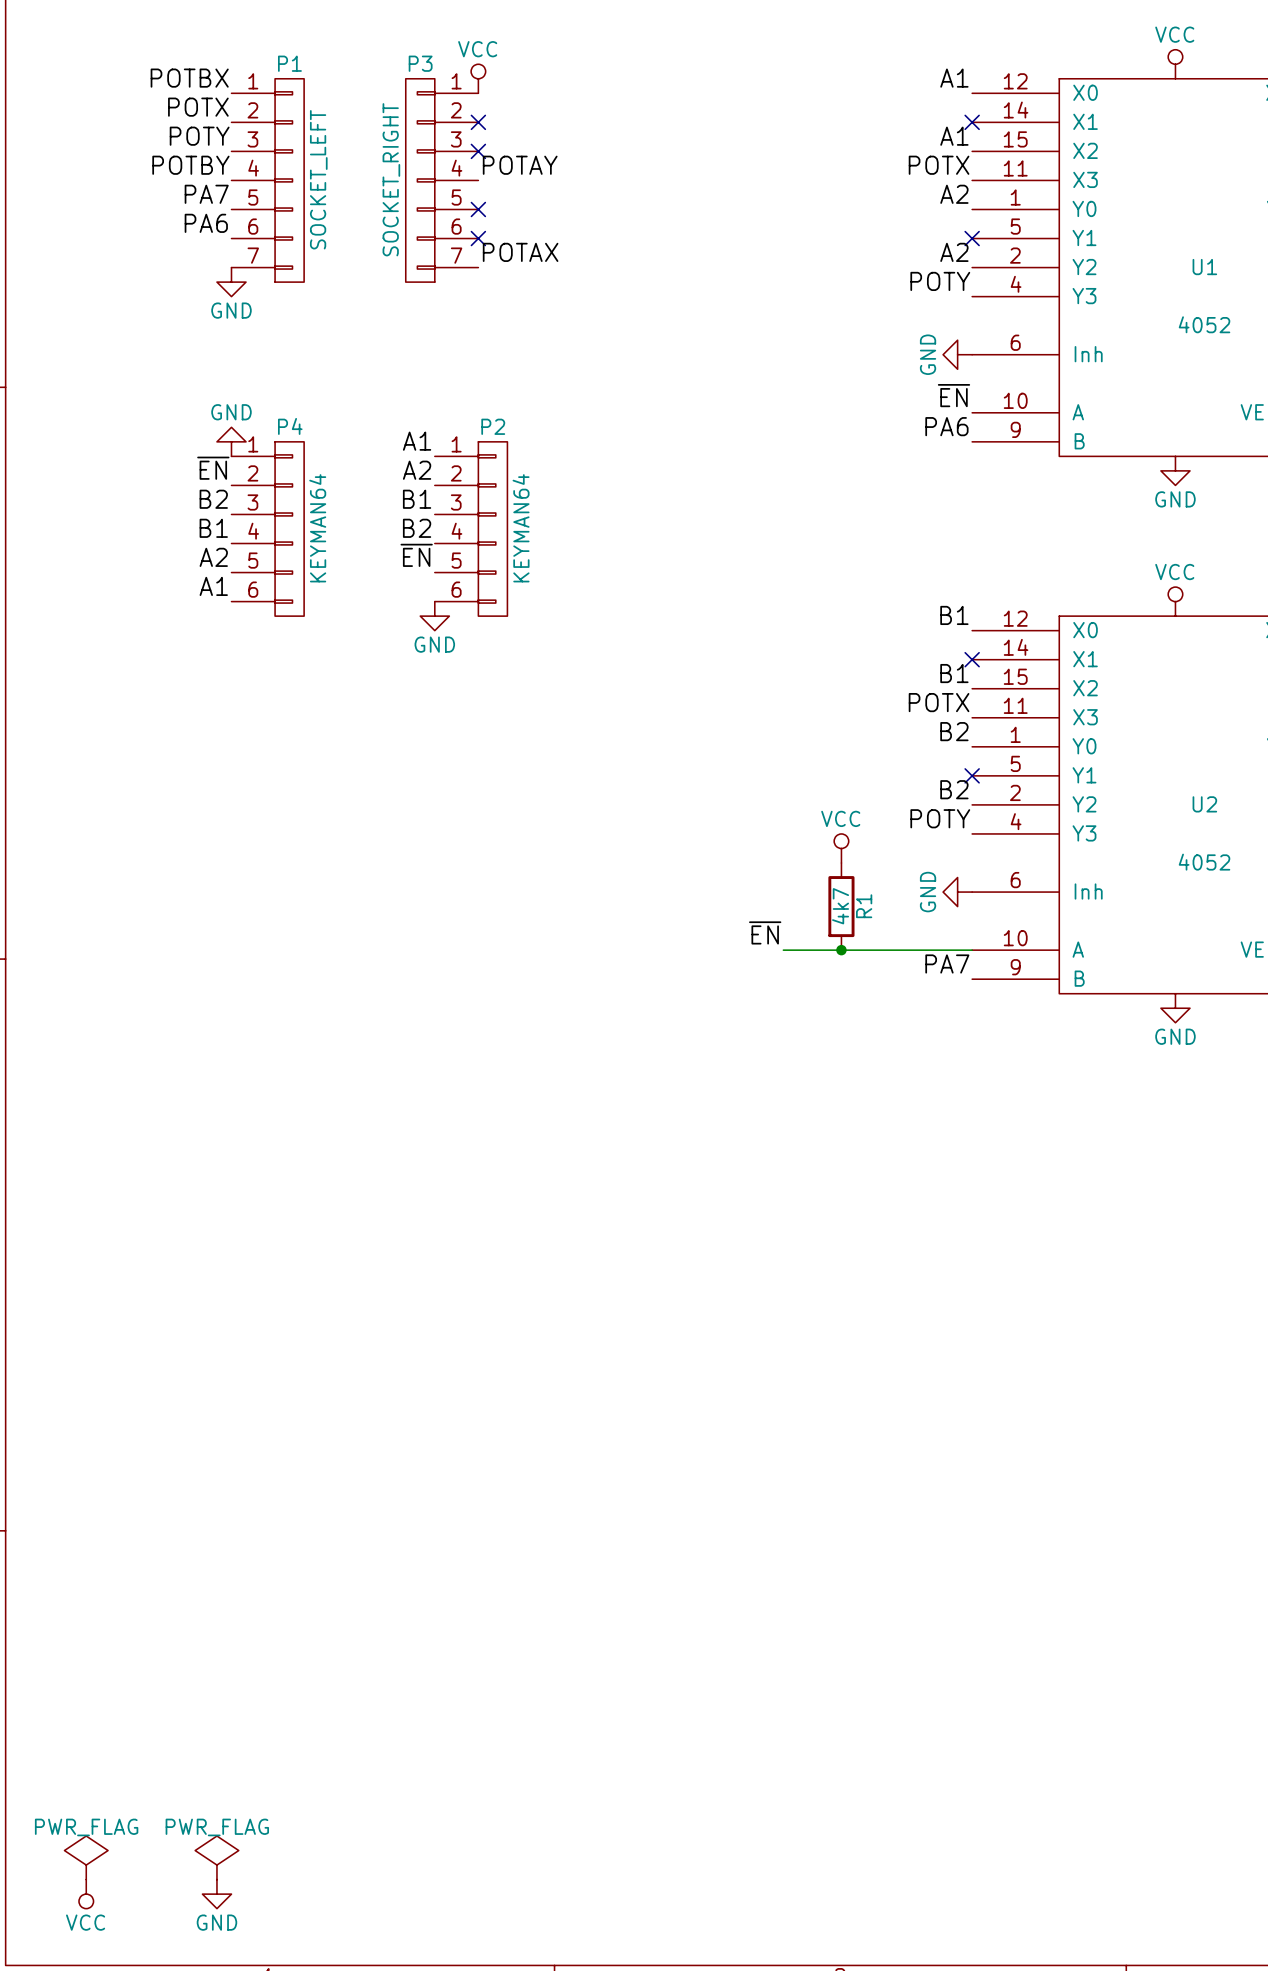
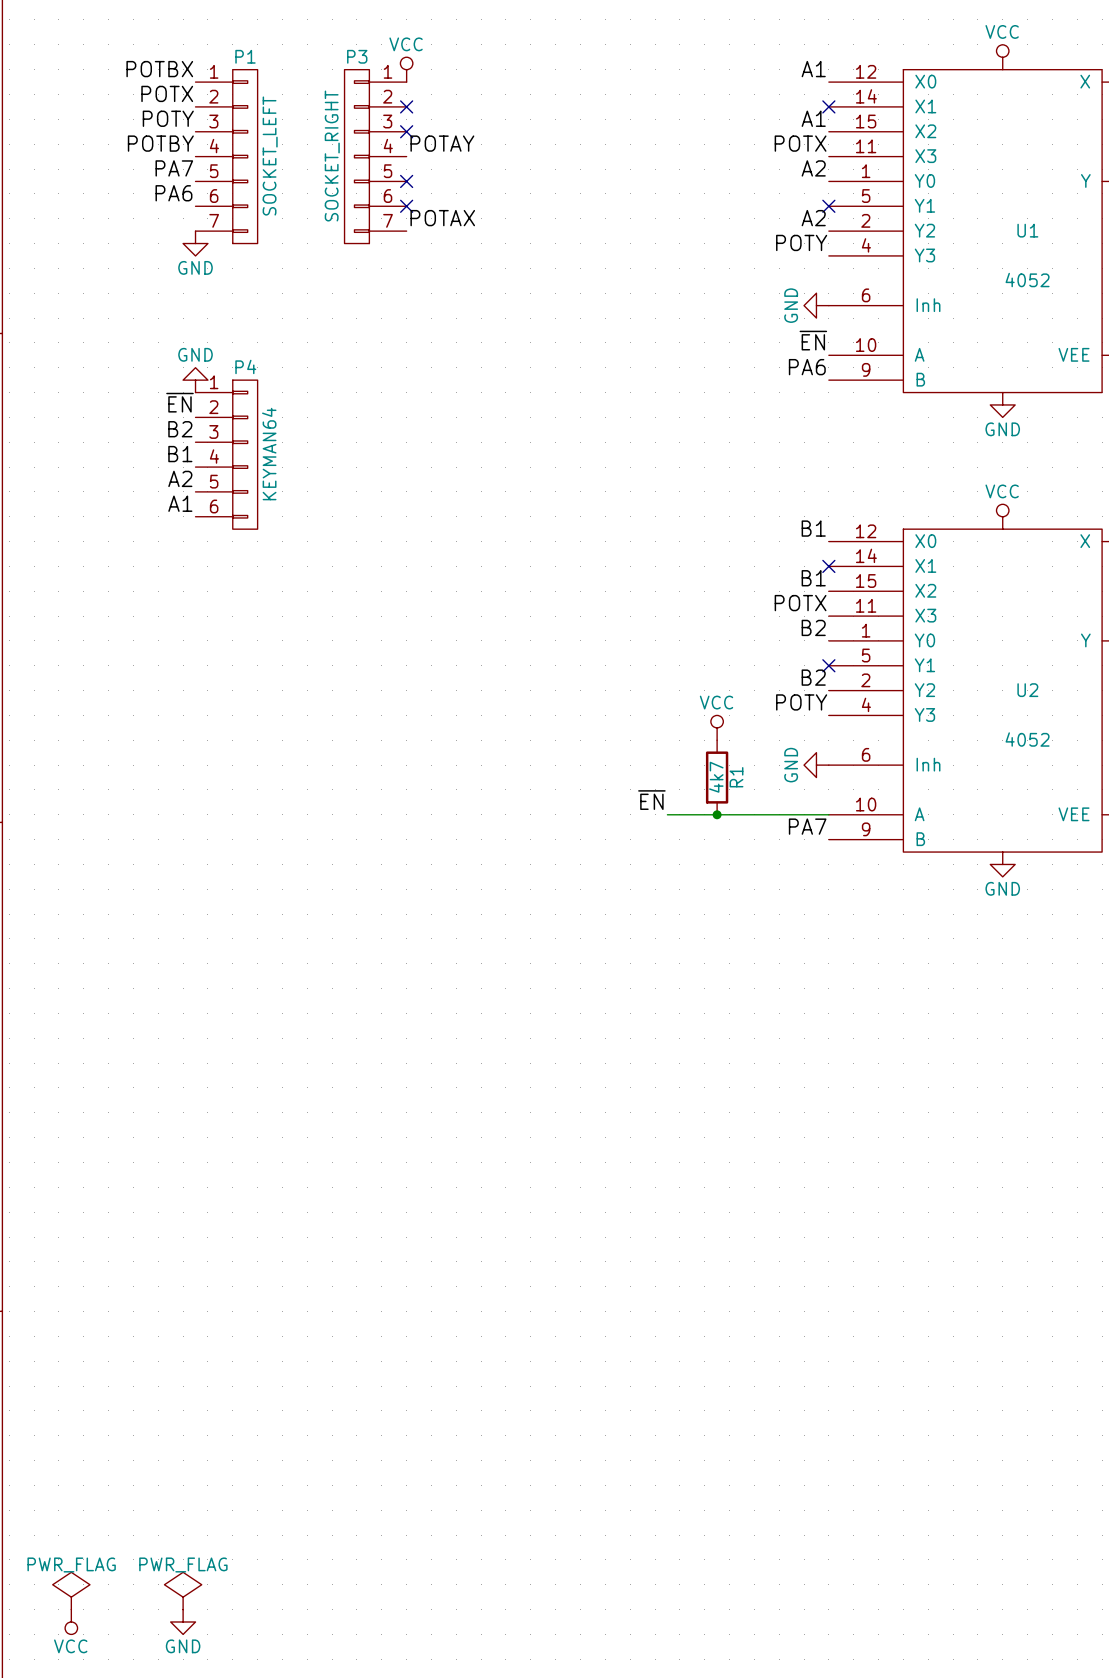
label: A1 (417, 441) -> none
label: A2 (417, 470) -> none
label: B1 (417, 499) -> none
label: B2 (417, 528) -> none
P2: KEYMAN64 (471, 528) -> none
label: ~{EN} (416, 555) -> none
power symbol: GND (434, 616) -> none

